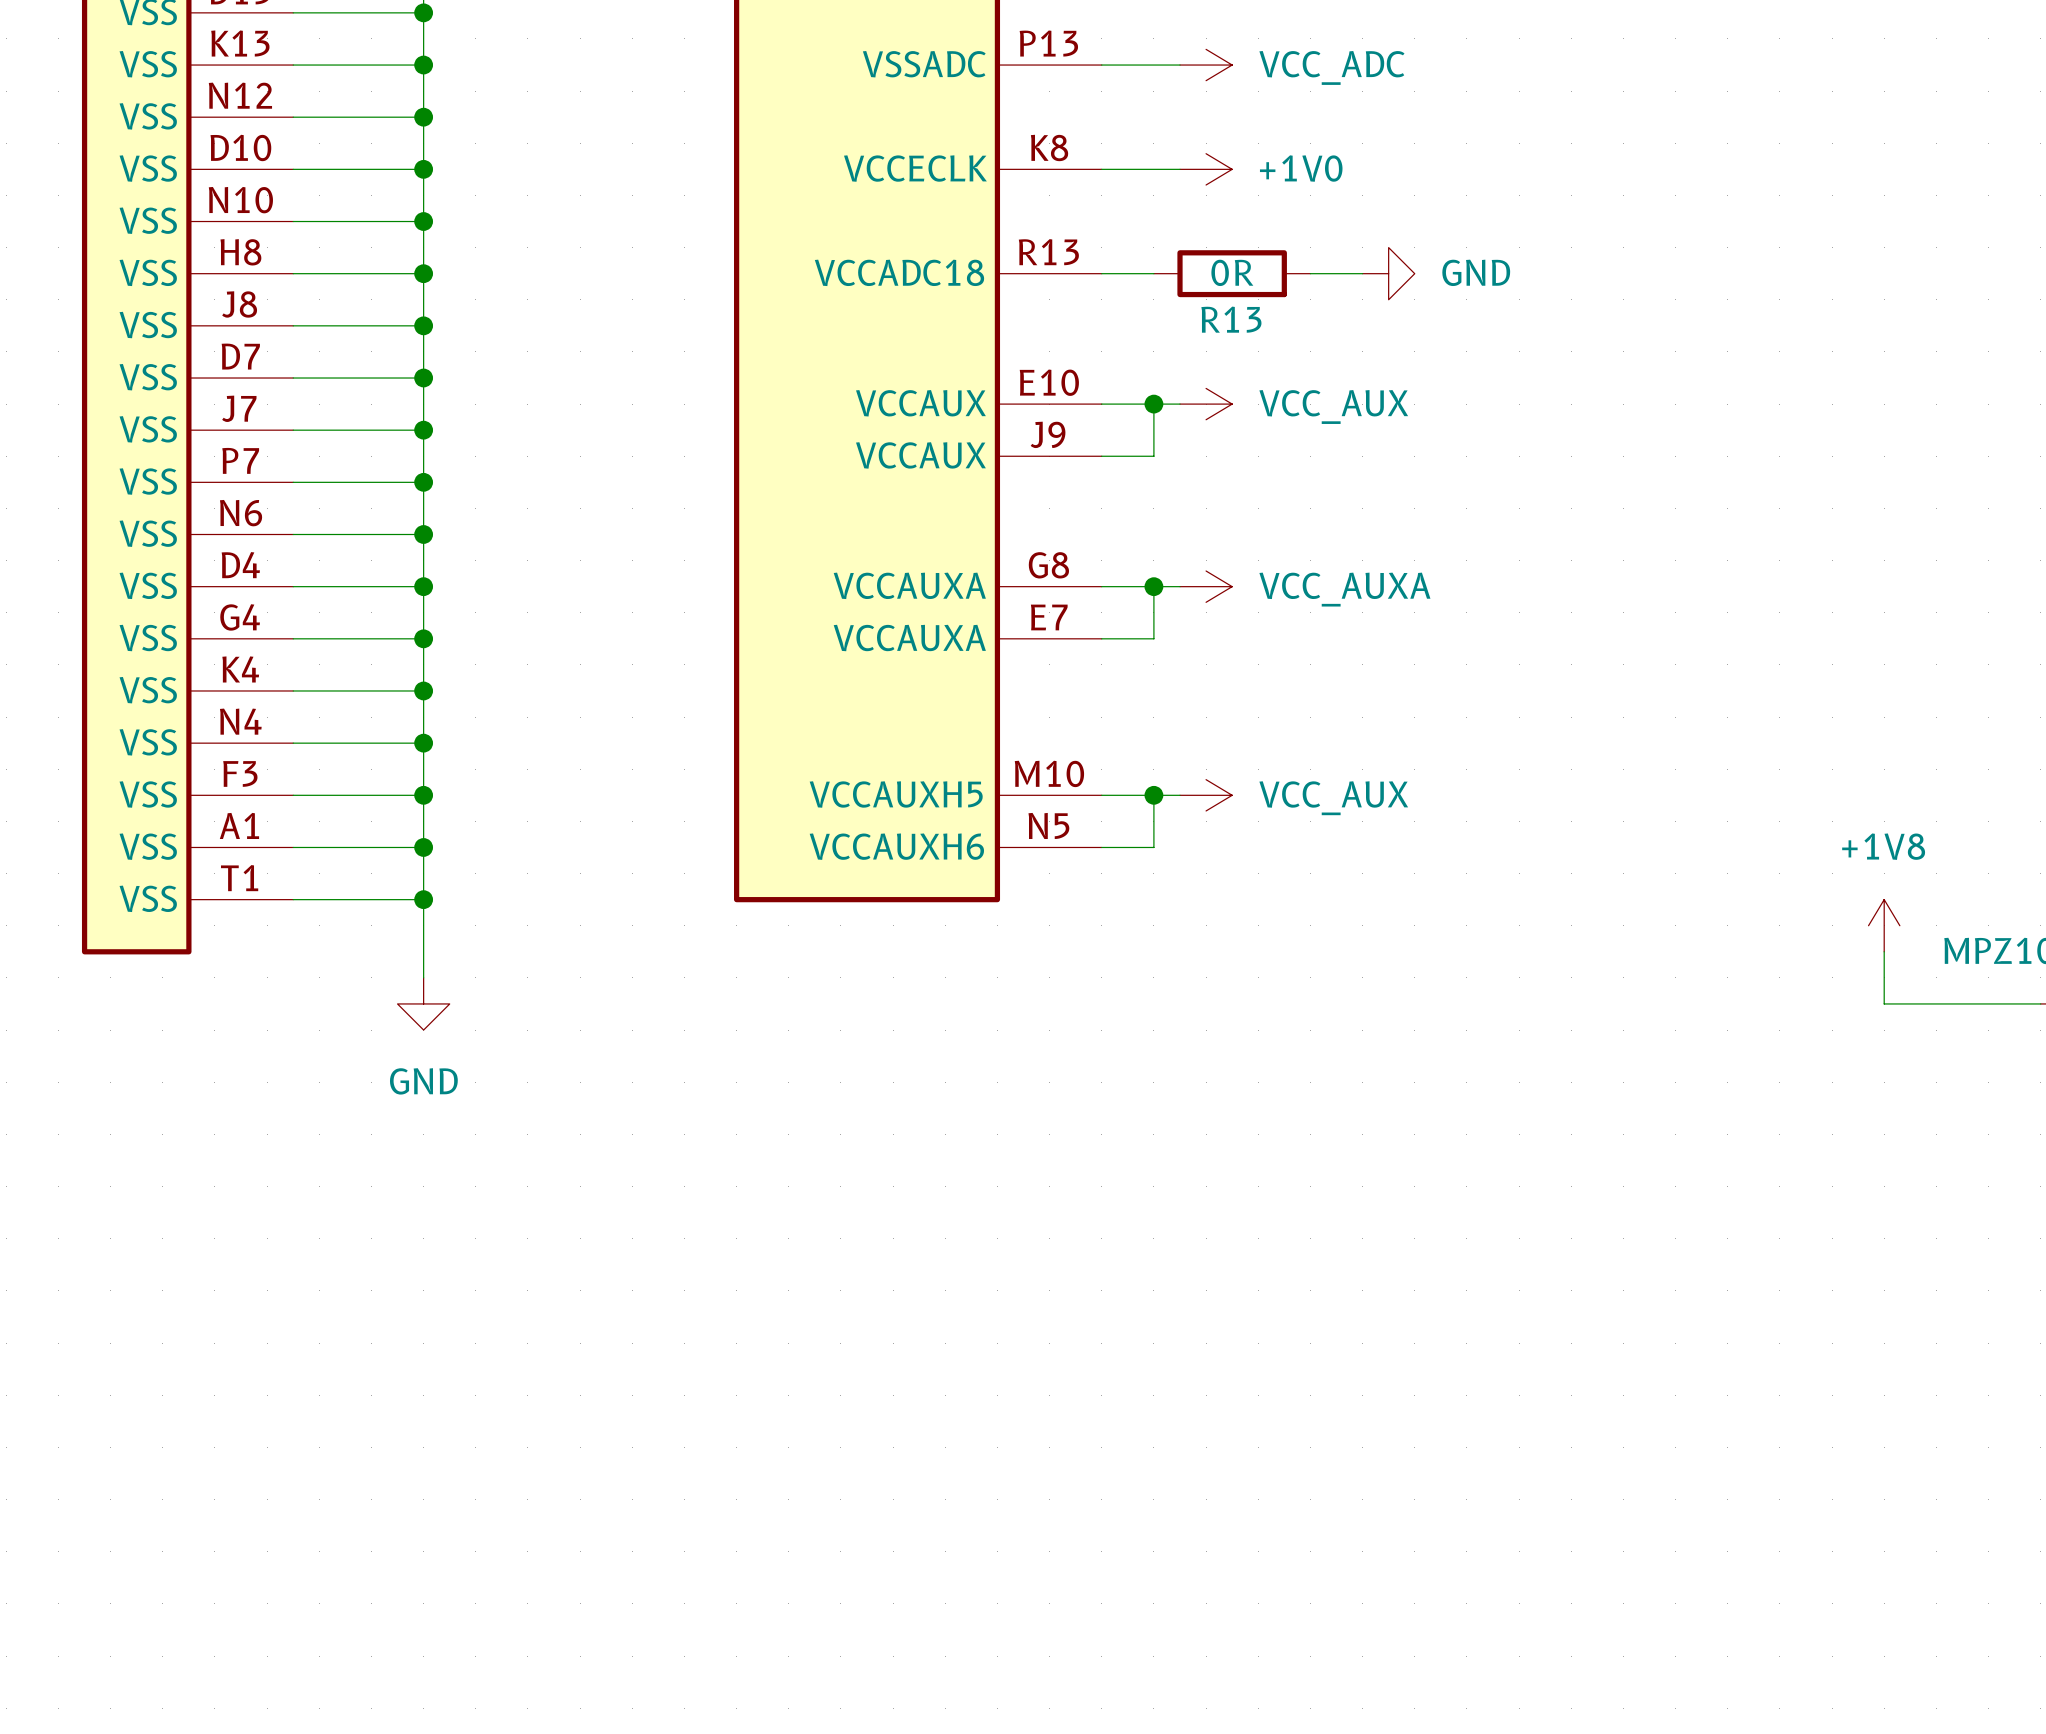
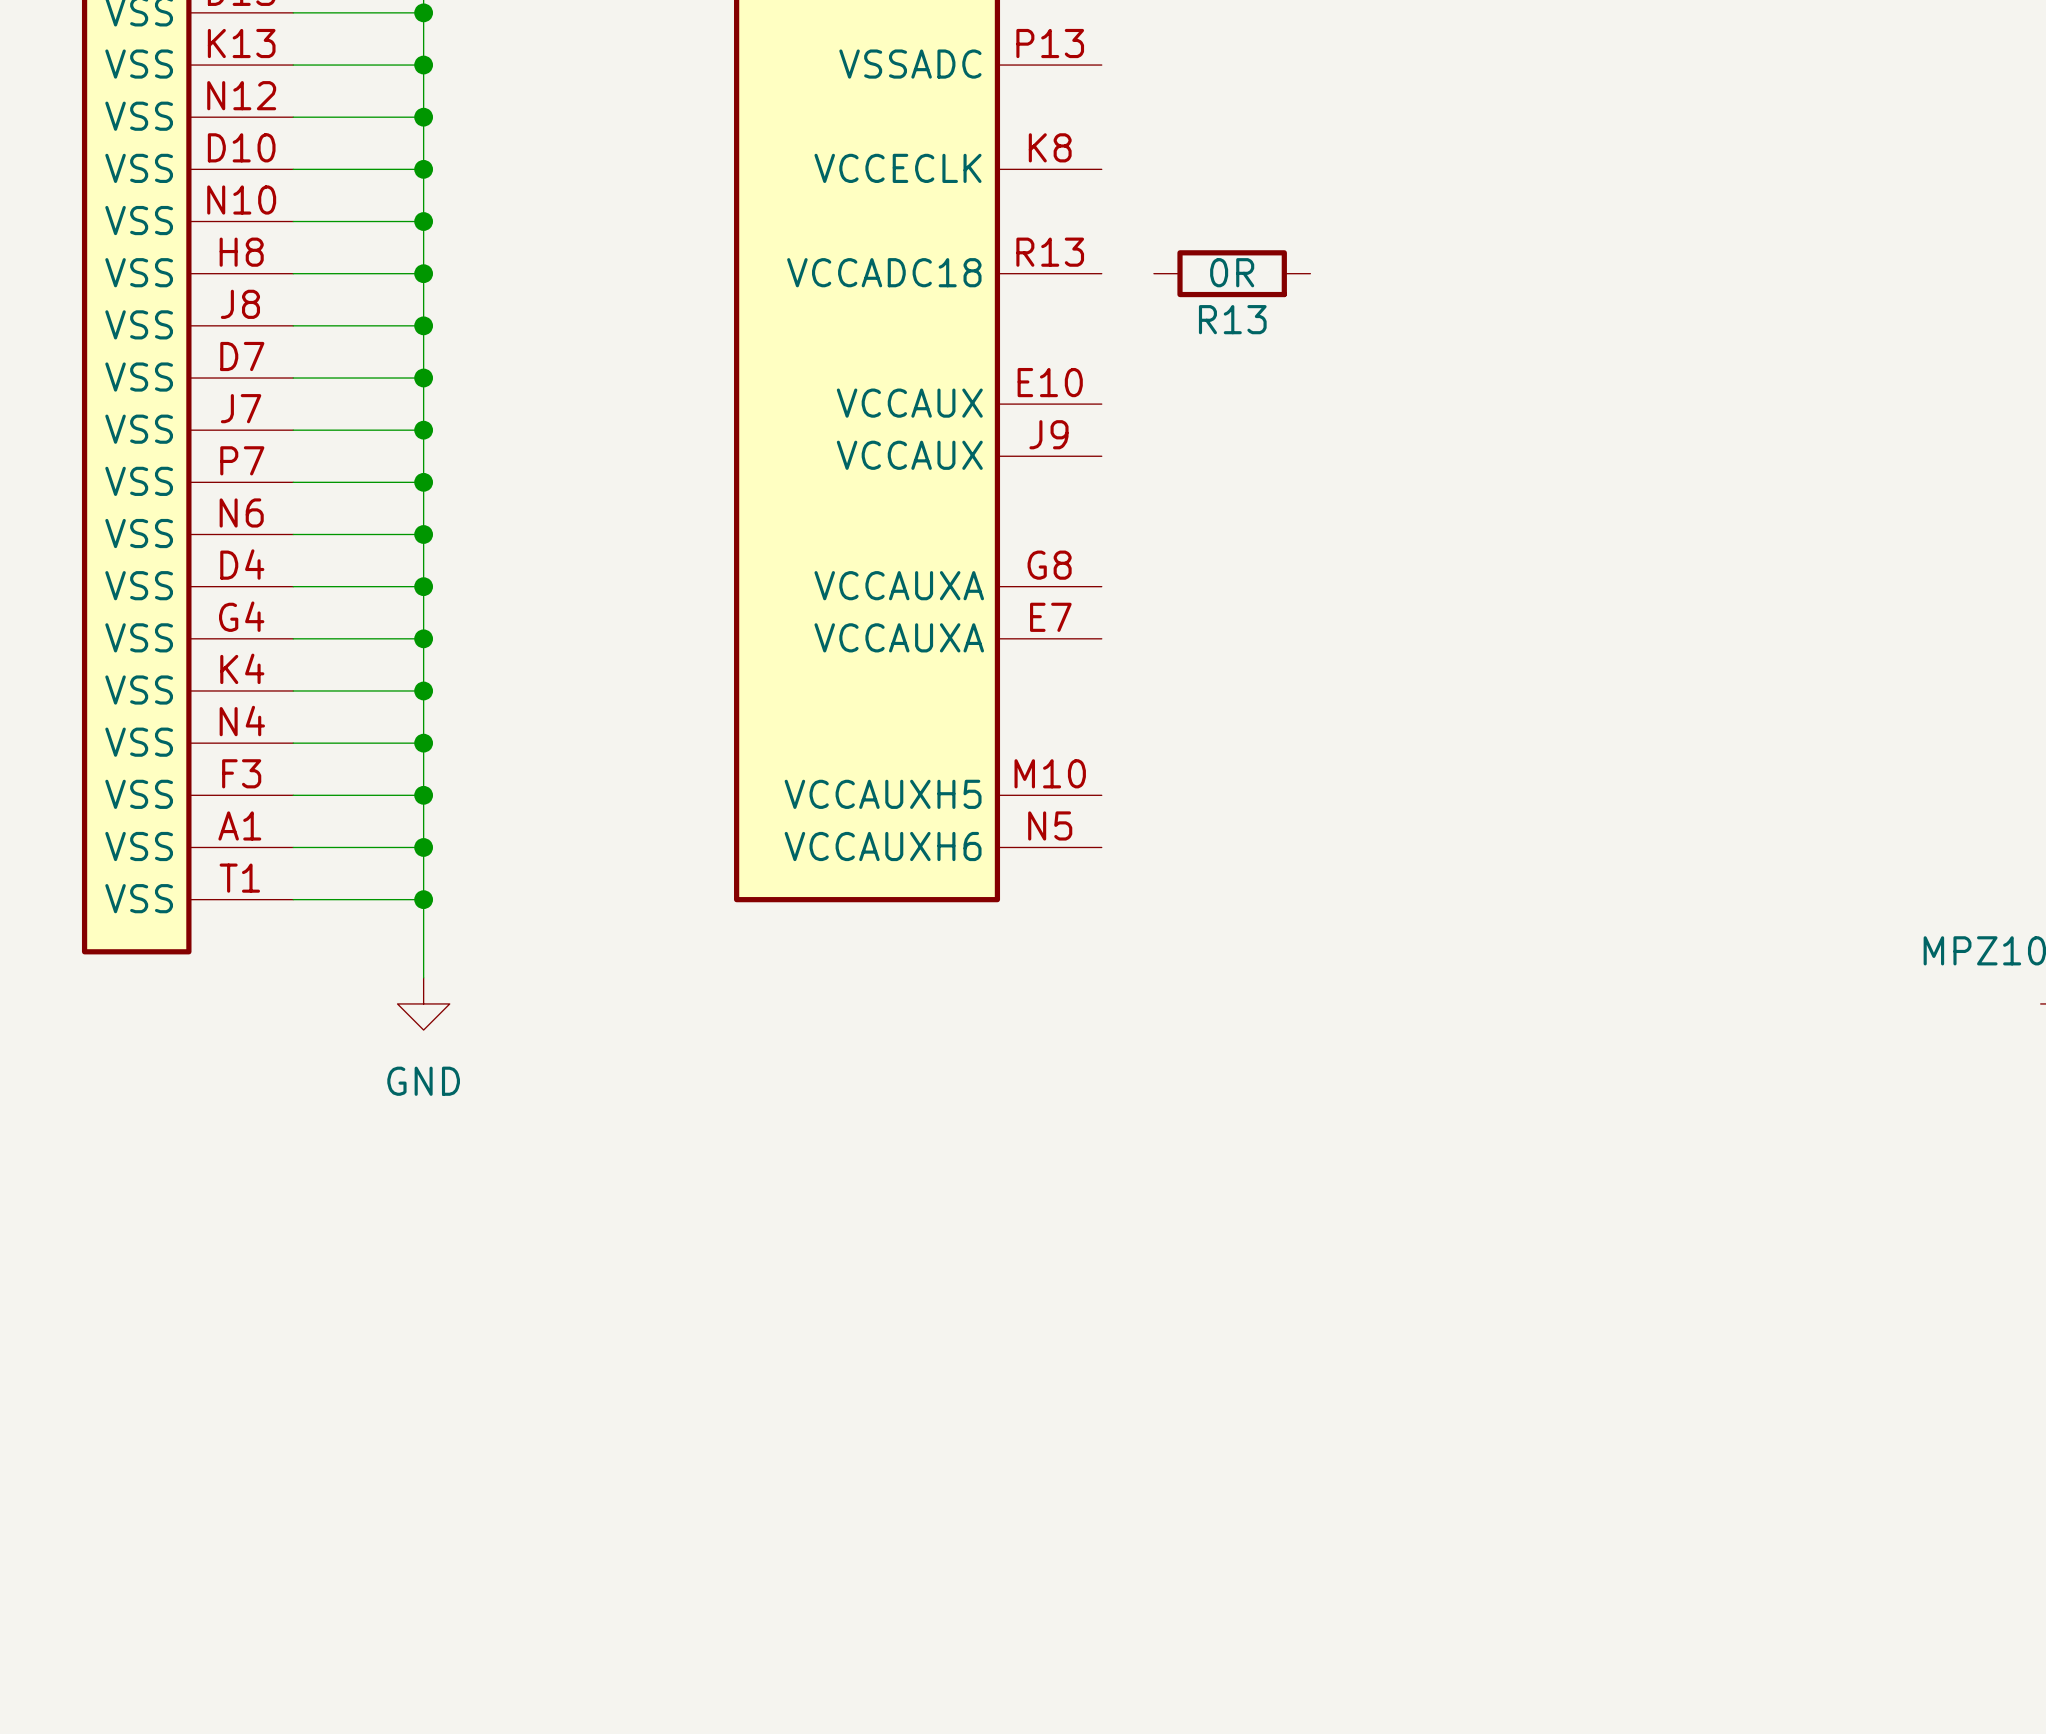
wire: (1101, 65) (1180, 65) -> none
power symbol: VCC_ADC (1206, 65) -> none
wire: (1101, 169) (1180, 169) -> none
power symbol: +1V0 (1206, 169) -> none
wire: (1101, 273) (1153, 273) -> none
wire: (1310, 273) (1362, 273) -> none
power symbol: GND (1388, 273) -> none
wire: (1101, 404) (1180, 404) -> none
wire: (1153, 404) (1153, 456) (1101, 456) -> none
junction: (1153, 404) -> none
power symbol: VCC_AUX (1206, 404) -> none
wire: (1101, 586) (1180, 586) -> none
wire: (1153, 586) (1153, 638) (1101, 638) -> none
junction: (1153, 586) -> none
power symbol: VCC_AUXA (1206, 586) -> none
wire: (1101, 795) (1180, 795) -> none
wire: (1153, 795) (1153, 847) (1101, 847) -> none
junction: (1153, 795) -> none
power symbol: VCC_AUX (1206, 795) -> none
power symbol: +1V8 (1884, 925) -> none
wire: (1884, 951) (1884, 1003) (2040, 1003) -> none

